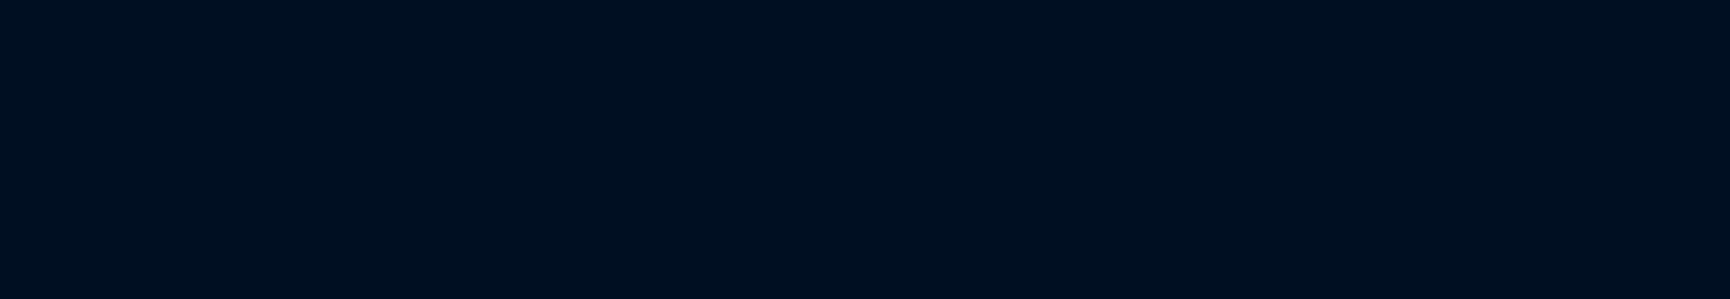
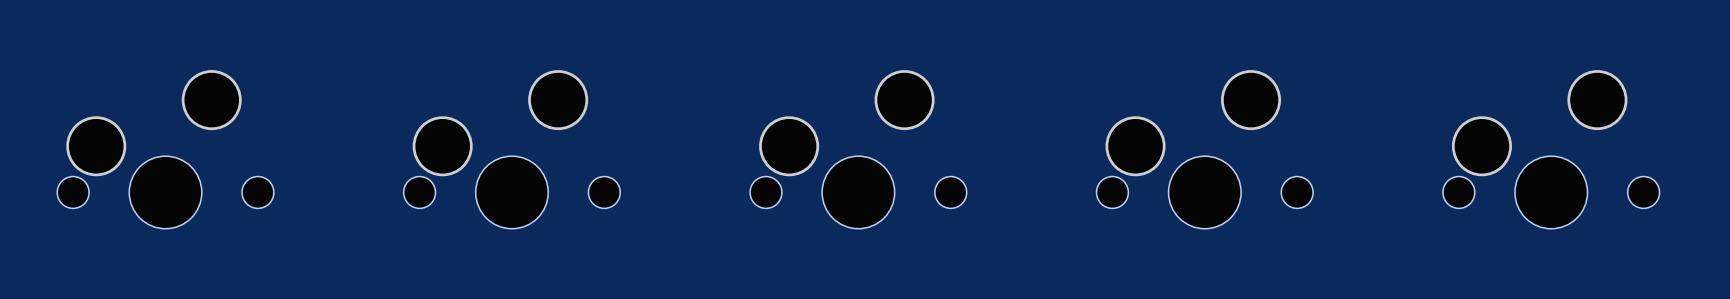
part: none -> (165, 149)
part: none -> (511, 149)
part: none -> (858, 149)
part: none -> (1204, 149)
part: none -> (1551, 149)

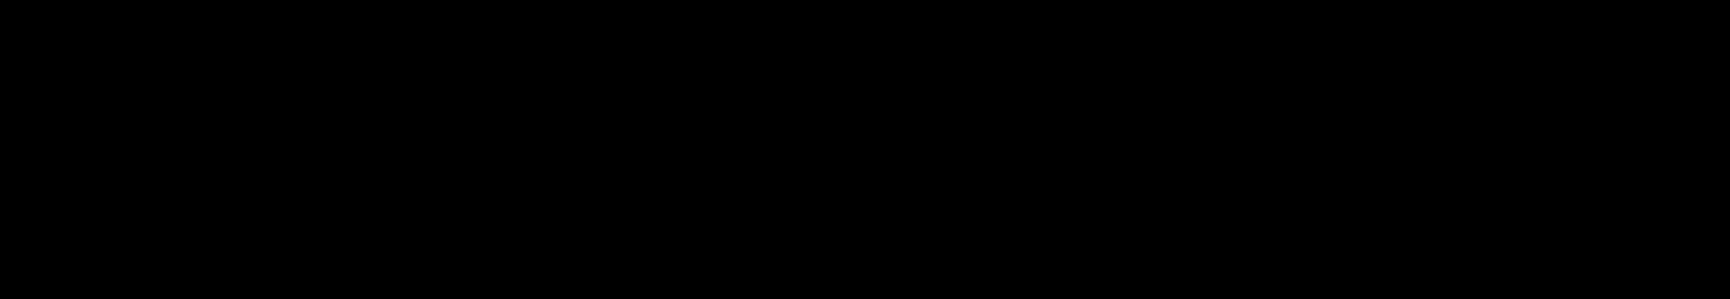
part: (165, 149) -> none
part: (511, 149) -> none
part: (858, 149) -> none
part: (1204, 149) -> none
part: (1551, 149) -> none

